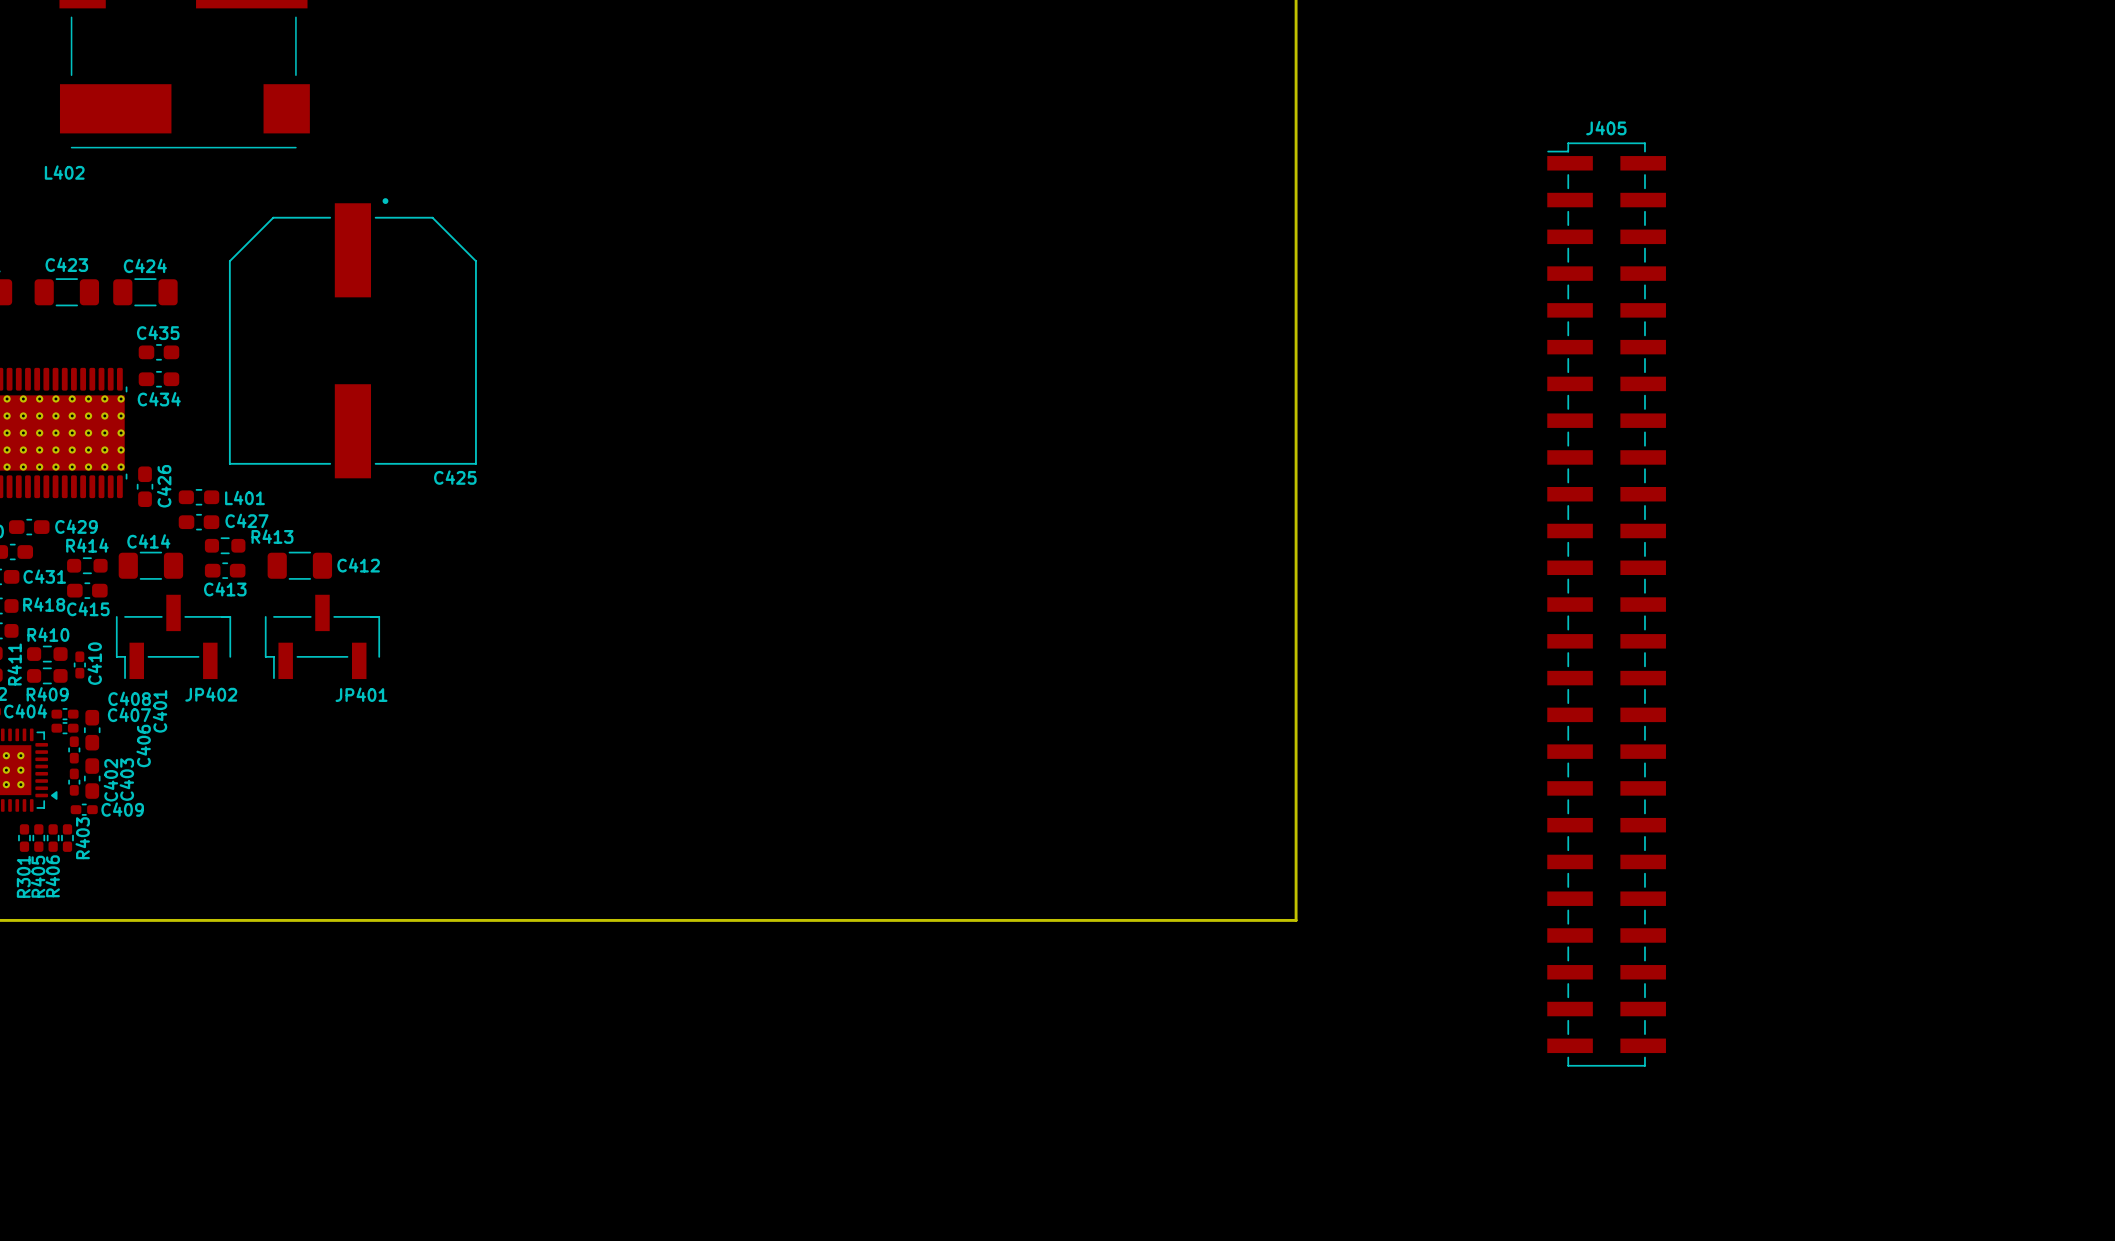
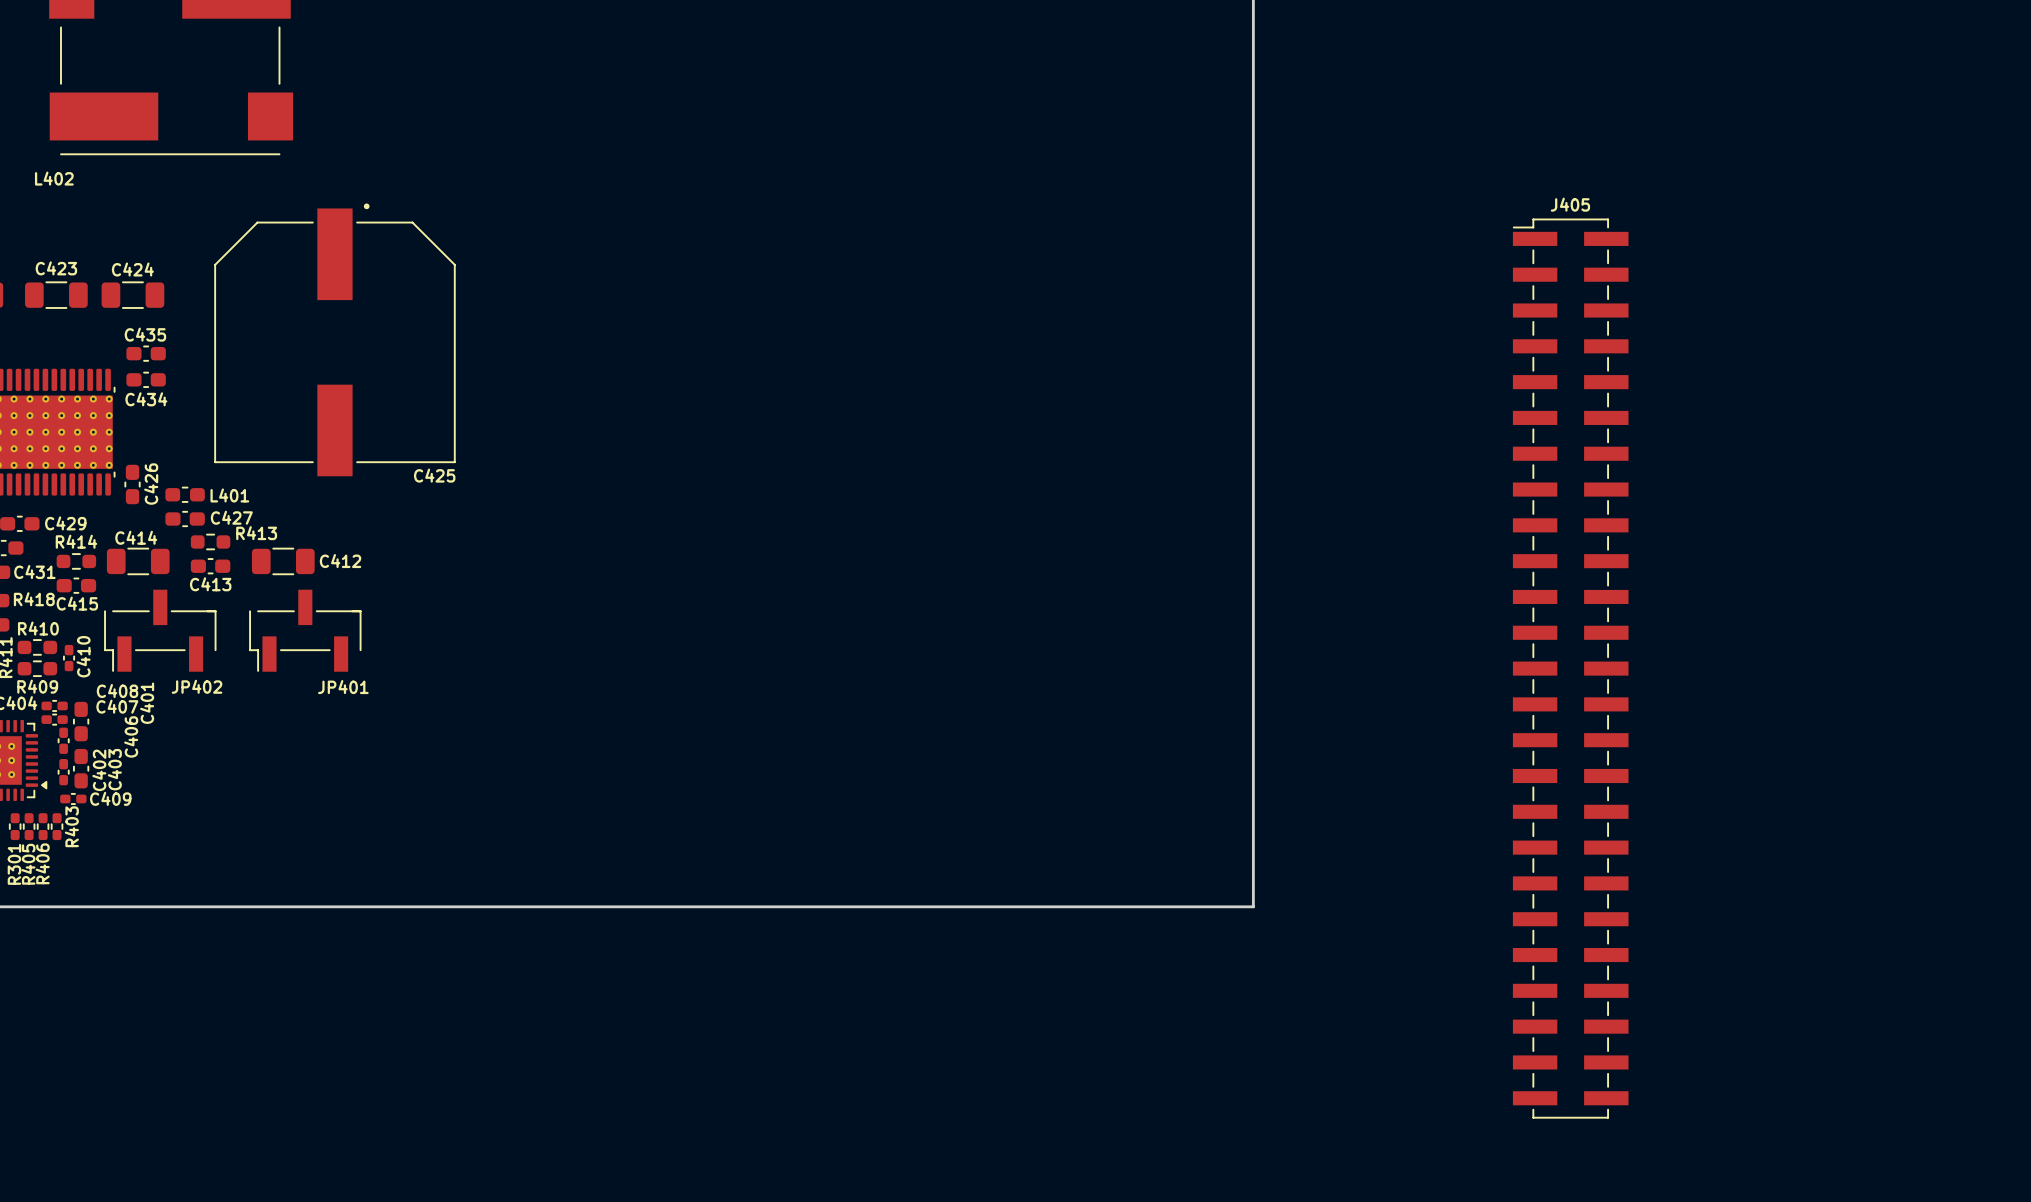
J405 position: (1606, 604) -> (1570, 668)

